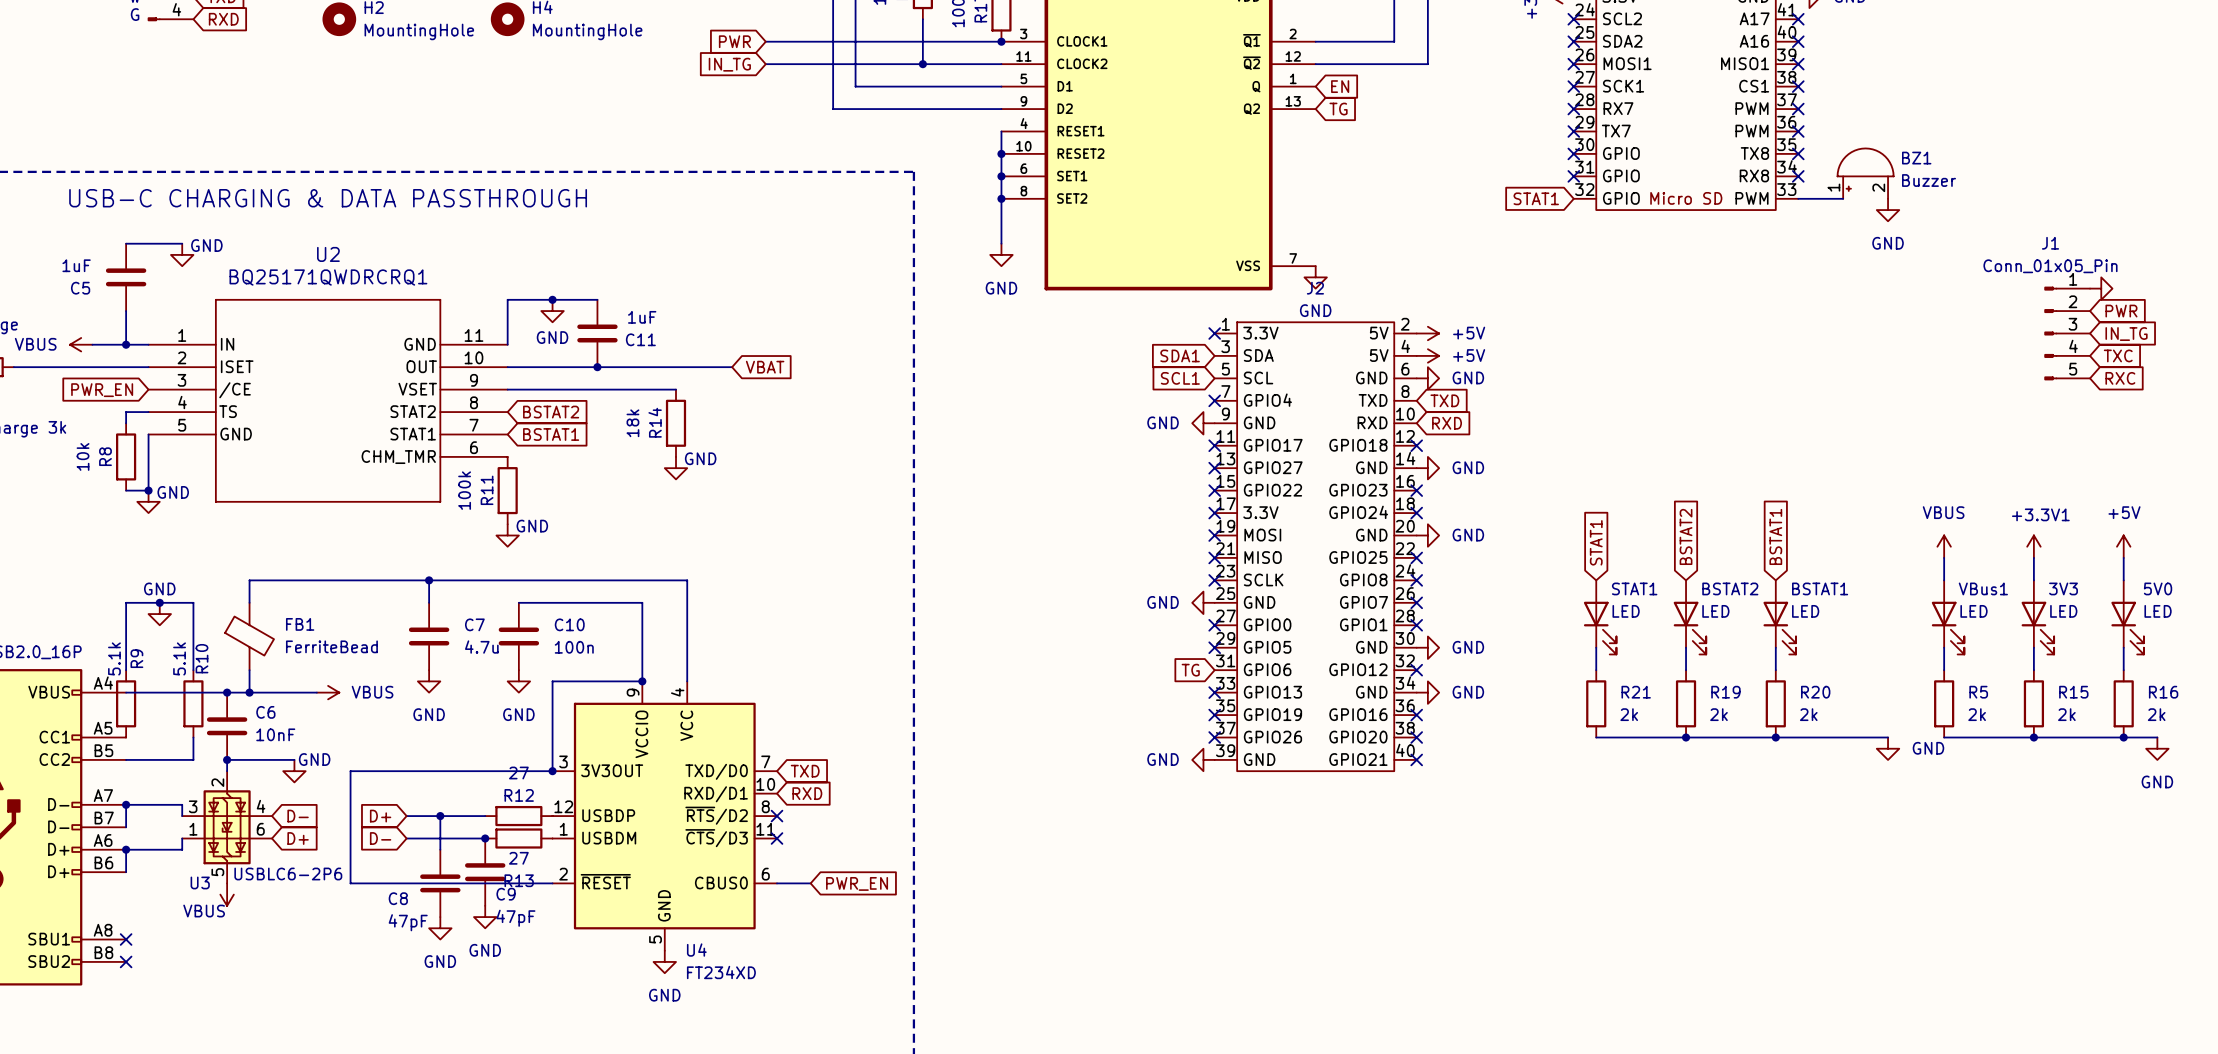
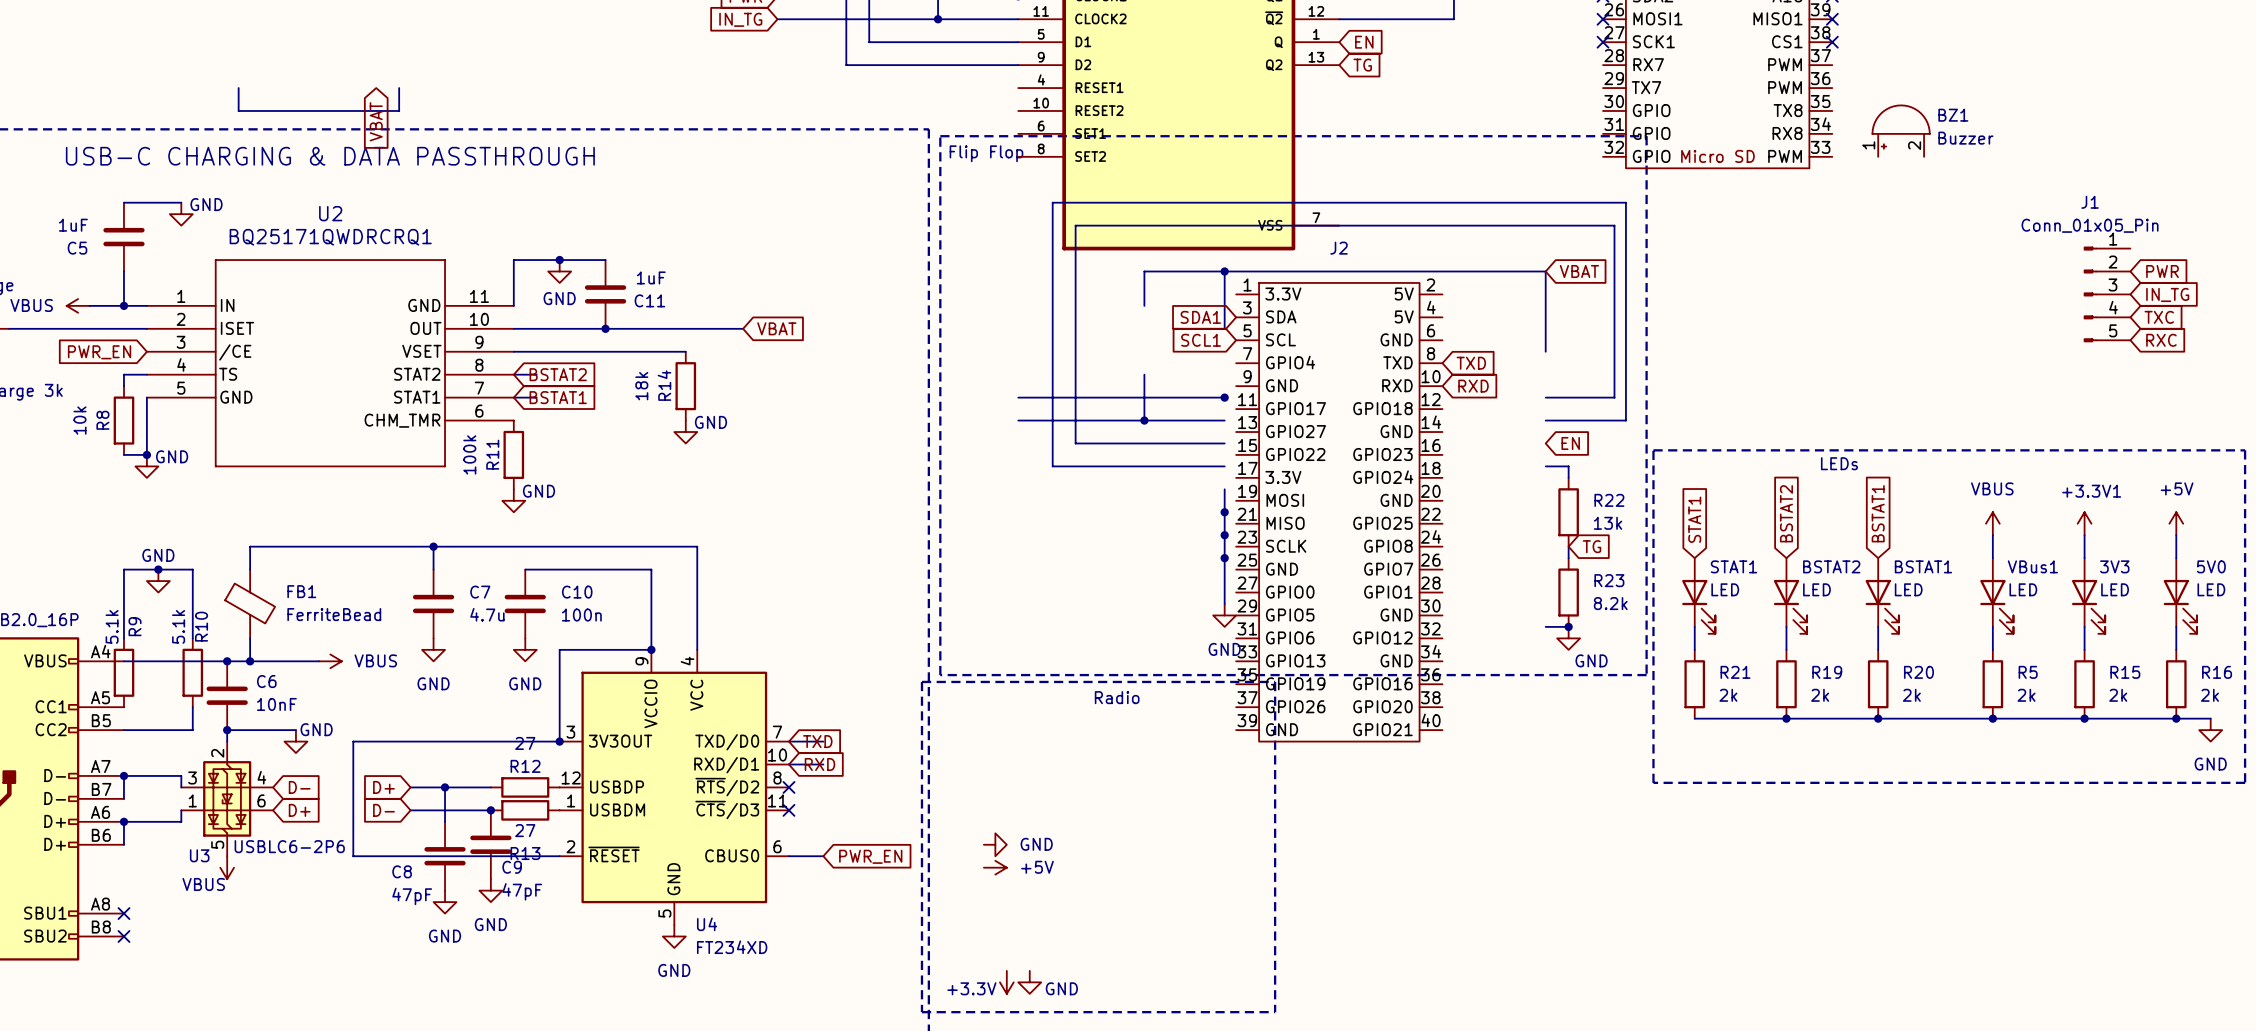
no-connect mark: (1573, 109) -> none
no-connect mark: (1798, 109) -> none
wire: none -> (238, 88) (238, 110) (399, 110) (399, 88)
wire: (1001, 131) (1001, 243) -> none
no-connect mark: (1573, 131) -> none
no-connect mark: (1798, 131) -> none
junction: (1001, 153) -> none
no-connect mark: (1573, 153) -> none
no-connect mark: (1798, 153) -> none
global label: none -> VBAT (376, 121)
junction: (1001, 176) -> none
no-connect mark: (1573, 176) -> none
no-connect mark: (1798, 176) -> none
line: none -> (940, 136) (1646, 136) (1646, 675) (940, 675) (940, 136)
text: none -> Flip Flop (986, 153)
junction: (1001, 198) -> none
global label: STAT1 (1536, 198) -> none
wire: (1798, 198) (1843, 198) -> none
power symbol: GND (1888, 210) -> none
power symbol: GND (1001, 254) -> none
power symbol: GND (1315, 277) -> none
power symbol: (2101, 288) -> none
wire: none -> (1224, 271) (1224, 328)
junction: none -> (1224, 271)
global label: none -> VBAT (1579, 271)
no-connect mark: (1214, 333) -> none
power symbol: +5V (1427, 333) -> none
wire: none -> (1144, 305) (1144, 271) (1545, 271) (1545, 351)
power symbol: +5V (1427, 355) -> none
power symbol: GND (1427, 378) -> none
no-connect mark: (1214, 400) -> none
wire: none -> (513, 374) (536, 374)
wire: none -> (1144, 374) (1144, 420)
power symbol: GND (1203, 423) -> none
wire: none -> (513, 397) (536, 397)
wire: none -> (1018, 397) (1224, 397)
junction: none -> (1224, 397)
wire: none -> (1545, 397) (1614, 397) (1614, 225) (1075, 225) (1075, 443) (1224, 443)
no-connect mark: (1214, 445) -> none
no-connect mark: (1416, 445) -> none
wire: none -> (1018, 420) (1224, 420)
junction: none -> (1144, 420)
wire: none -> (1545, 420) (1625, 420) (1625, 202) (1052, 202) (1052, 466) (1224, 466)
no-connect mark: (1214, 468) -> none
power symbol: GND (1427, 468) -> none
global label: none -> EN (1570, 443)
line: none -> (1653, 450) (2245, 450) (2245, 782) (1653, 782) (1653, 450)
no-connect mark: (1214, 490) -> none
no-connect mark: (1416, 490) -> none
text: none -> LEDs (1839, 463)
wire: none -> (1545, 466) (1568, 466) (1568, 477)
no-connect mark: (1214, 513) -> none
no-connect mark: (1416, 513) -> none
wire: none -> (1224, 489) (1224, 603)
no-connect mark: (1214, 535) -> none
power symbol: GND (1427, 535) -> none
global label position: BSTAT2 (1686, 536) -> BSTAT2 (1786, 513)
global label position: BSTAT1 (1775, 536) -> BSTAT1 (1878, 513)
global label position: STAT1 (1596, 542) -> STAT1 (1694, 519)
junction: none -> (1224, 512)
R22: none -> 13k (1568, 512)
power symbol position: VBUS (1944, 546) -> VBUS (1992, 523)
power symbol position: +3.3V1 (2033, 546) -> +3.3V1 (2084, 523)
power symbol position: +5V (2123, 546) -> +5V (2176, 523)
no-connect mark: (1214, 557) -> none
no-connect mark: (1416, 557) -> none
wire: (1944, 557) (1944, 580) -> (1992, 535) (1992, 558)
wire: (2033, 557) (2033, 580) -> (2084, 535) (2084, 558)
wire: (2123, 557) (2123, 580) -> (2176, 535) (2176, 558)
junction: none -> (1224, 535)
no-connect mark: (1214, 580) -> none
no-connect mark: (1416, 580) -> none
wire: none -> (1568, 546) (1568, 558)
global label: none -> TG (1591, 546)
junction: none -> (1224, 558)
power symbol rotation: 0° (1203, 602) -> 90° counterclockwise (1224, 615)
power symbol position: GND (1203, 602) -> GND (1224, 615)
no-connect mark: (1416, 602) -> none
STAT1 position: (1600, 617) -> (1698, 595)
BSTAT2 position: (1689, 617) -> (1790, 595)
BSTAT1 position: (1779, 617) -> (1882, 595)
VBus1 position: (1948, 617) -> (1996, 595)
3V3 position: (2037, 617) -> (2088, 595)
5V0 position: (2127, 617) -> (2180, 595)
no-connect mark: (1214, 625) -> none
no-connect mark: (1416, 625) -> none
R23: none -> 8.2k (1568, 592)
no-connect mark: (1214, 647) -> none
power symbol: GND (1427, 647) -> none
wire: (1596, 647) (1596, 670) -> (1694, 626) (1694, 649)
wire: (1686, 647) (1686, 670) -> (1786, 626) (1786, 649)
wire: (1775, 647) (1775, 670) -> (1878, 626) (1878, 649)
wire: (1944, 647) (1944, 670) -> (1992, 626) (1992, 649)
wire: (2033, 647) (2033, 670) -> (2084, 626) (2084, 649)
wire: (2123, 647) (2123, 670) -> (2176, 626) (2176, 649)
wire: none -> (1545, 626) (1568, 626)
junction: none -> (1568, 626)
global label: TG (1190, 670) -> none
no-connect mark: (1416, 670) -> none
power symbol: none -> GND (1568, 638)
no-connect mark: (1214, 692) -> none
power symbol: GND (1427, 692) -> none
R21 position: (1596, 703) -> (1694, 684)
R19 position: (1686, 703) -> (1786, 684)
R20 position: (1775, 703) -> (1878, 684)
R5 position: (1944, 703) -> (1992, 684)
R15 position: (2033, 703) -> (2084, 684)
R16 position: (2123, 703) -> (2176, 684)
line: none -> (921, 681) (1275, 681) (1275, 1012) (921, 1012) (921, 681)
no-connect mark: (1214, 715) -> none
no-connect mark: (1416, 715) -> none
text: none -> Radio (1117, 697)
no-connect mark: (1214, 737) -> none
no-connect mark: (1416, 737) -> none
wire: (1596, 737) (1888, 737) -> none
junction: (1686, 737) -> none
junction position: (1775, 737) -> (1786, 718)
wire: (1944, 737) (2157, 737) -> none
junction position: (2033, 737) -> (2084, 718)
junction position: (2123, 737) -> (2176, 718)
wire: none -> (1694, 718) (2210, 718)
junction: none -> (1878, 718)
power symbol: GND (1888, 748) -> none
junction: none -> (1992, 718)
power symbol position: GND (2157, 748) -> GND (2210, 730)
power symbol: GND (1203, 759) -> none
no-connect mark: (1416, 759) -> none
wire: none -> (788, 741) (823, 741)
wire: none -> (788, 764) (823, 764)
power symbol: none -> GND (995, 844)
power symbol: none -> +5V (995, 867)
power symbol: none -> +3.3V (1006, 982)
power symbol: none -> GND (1029, 982)

